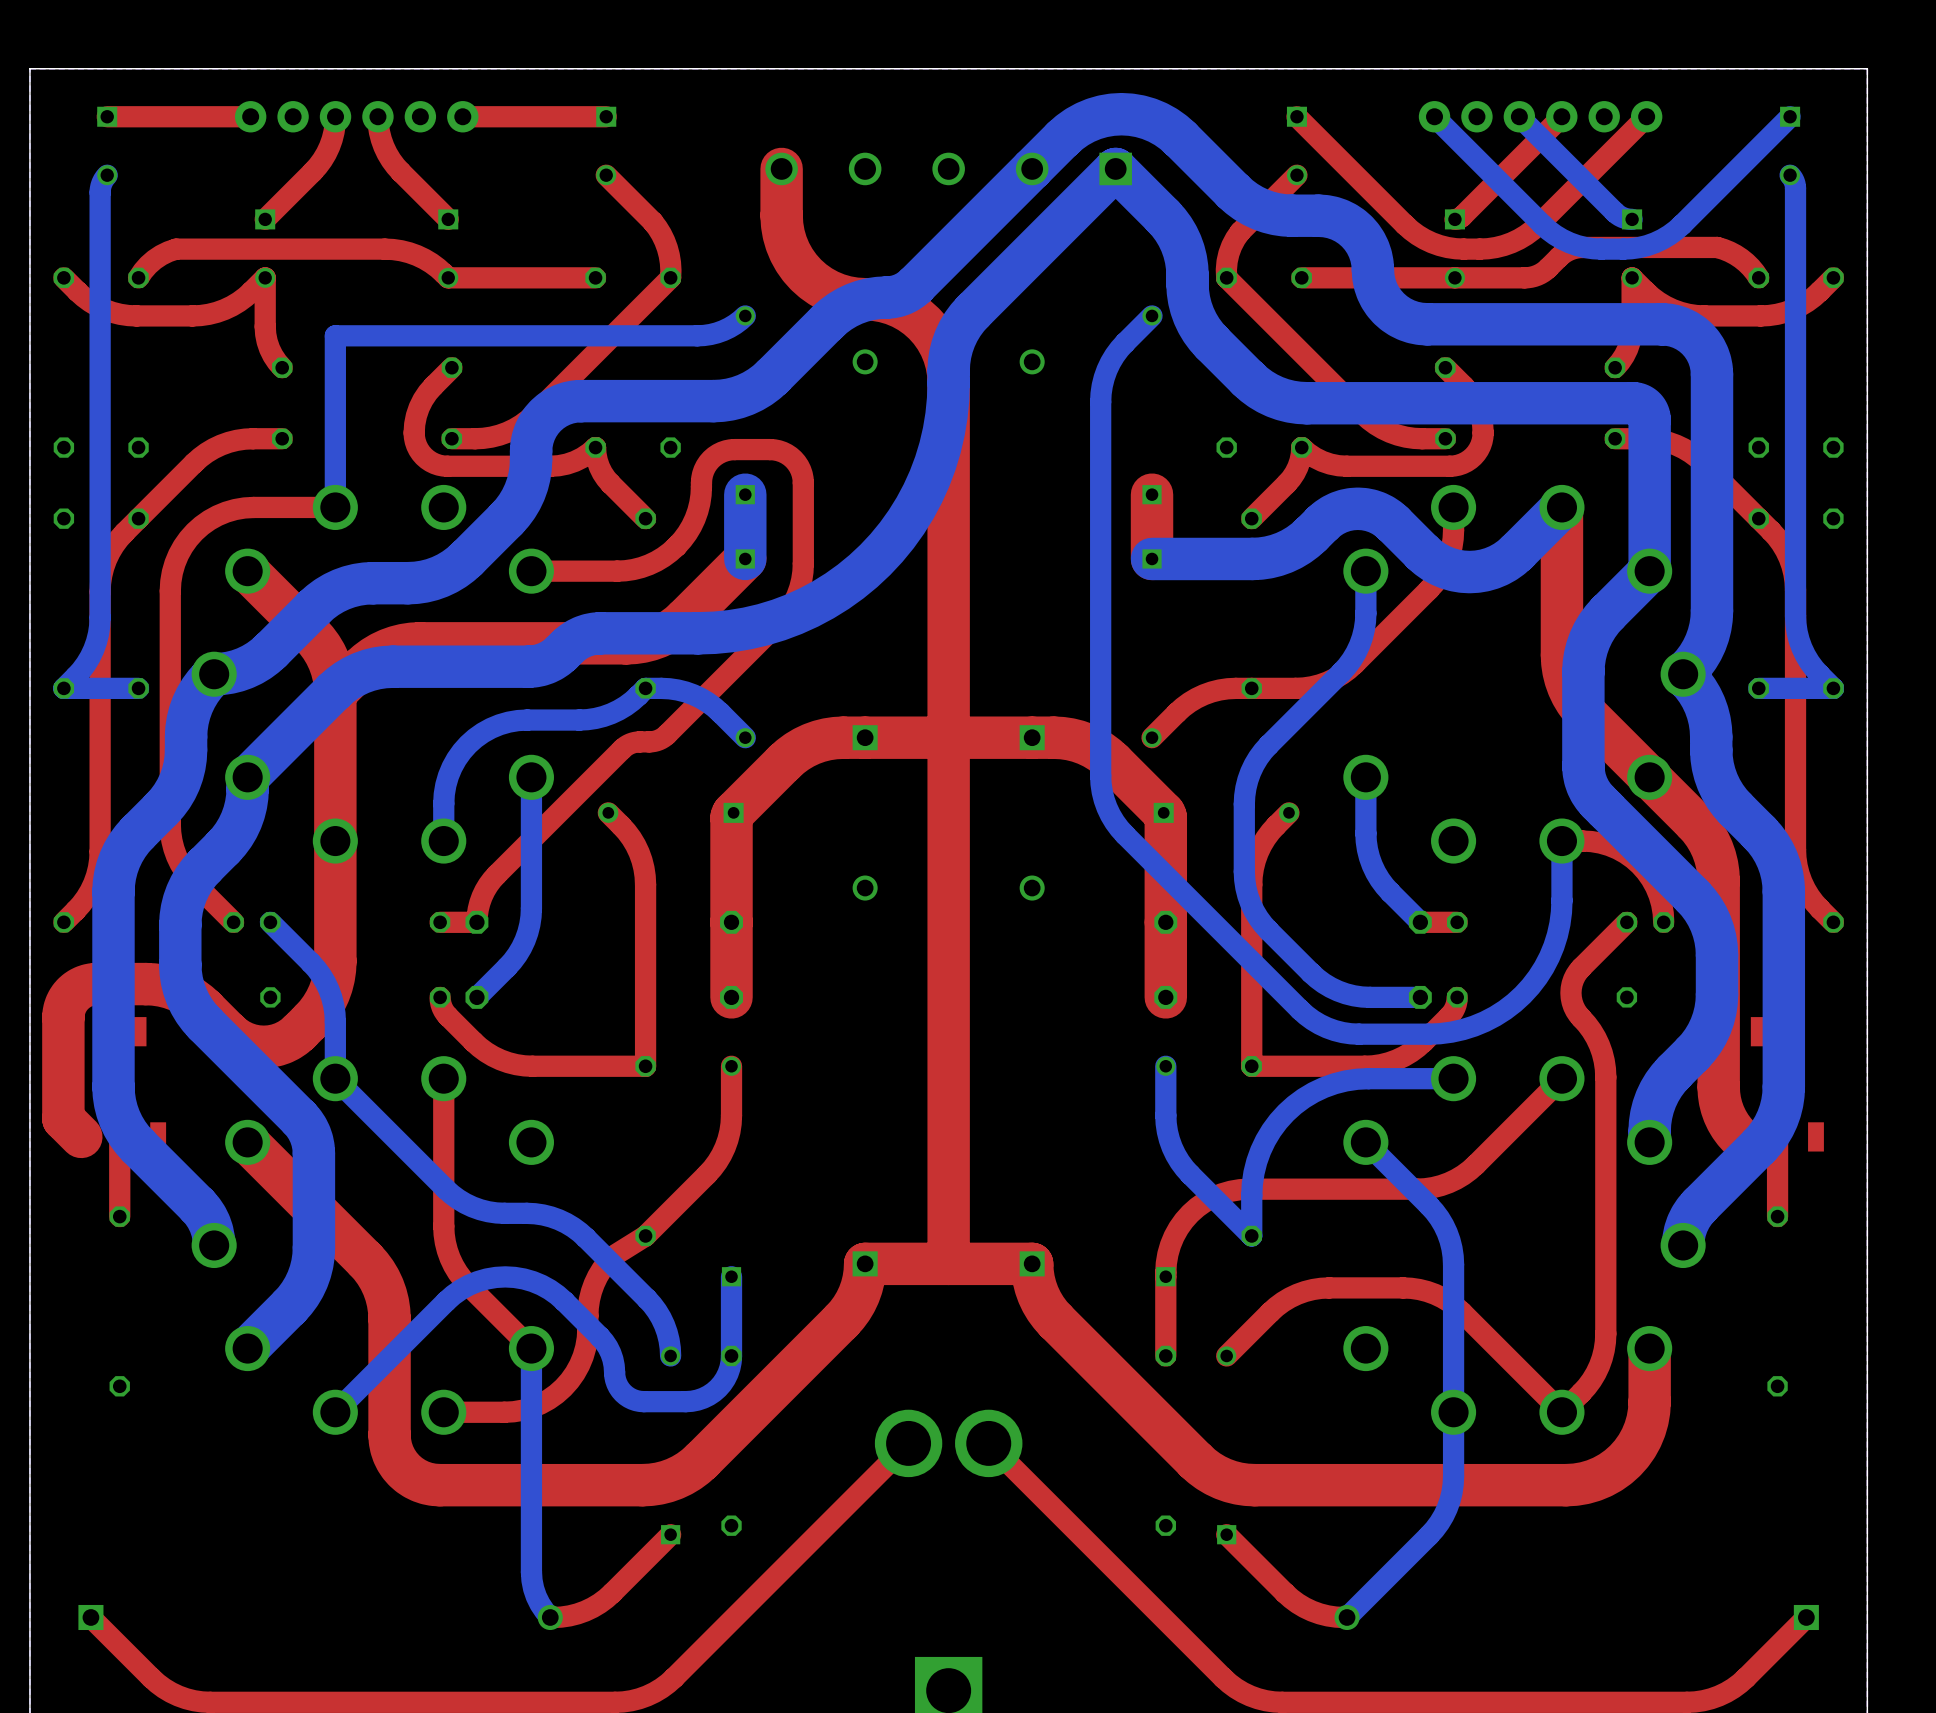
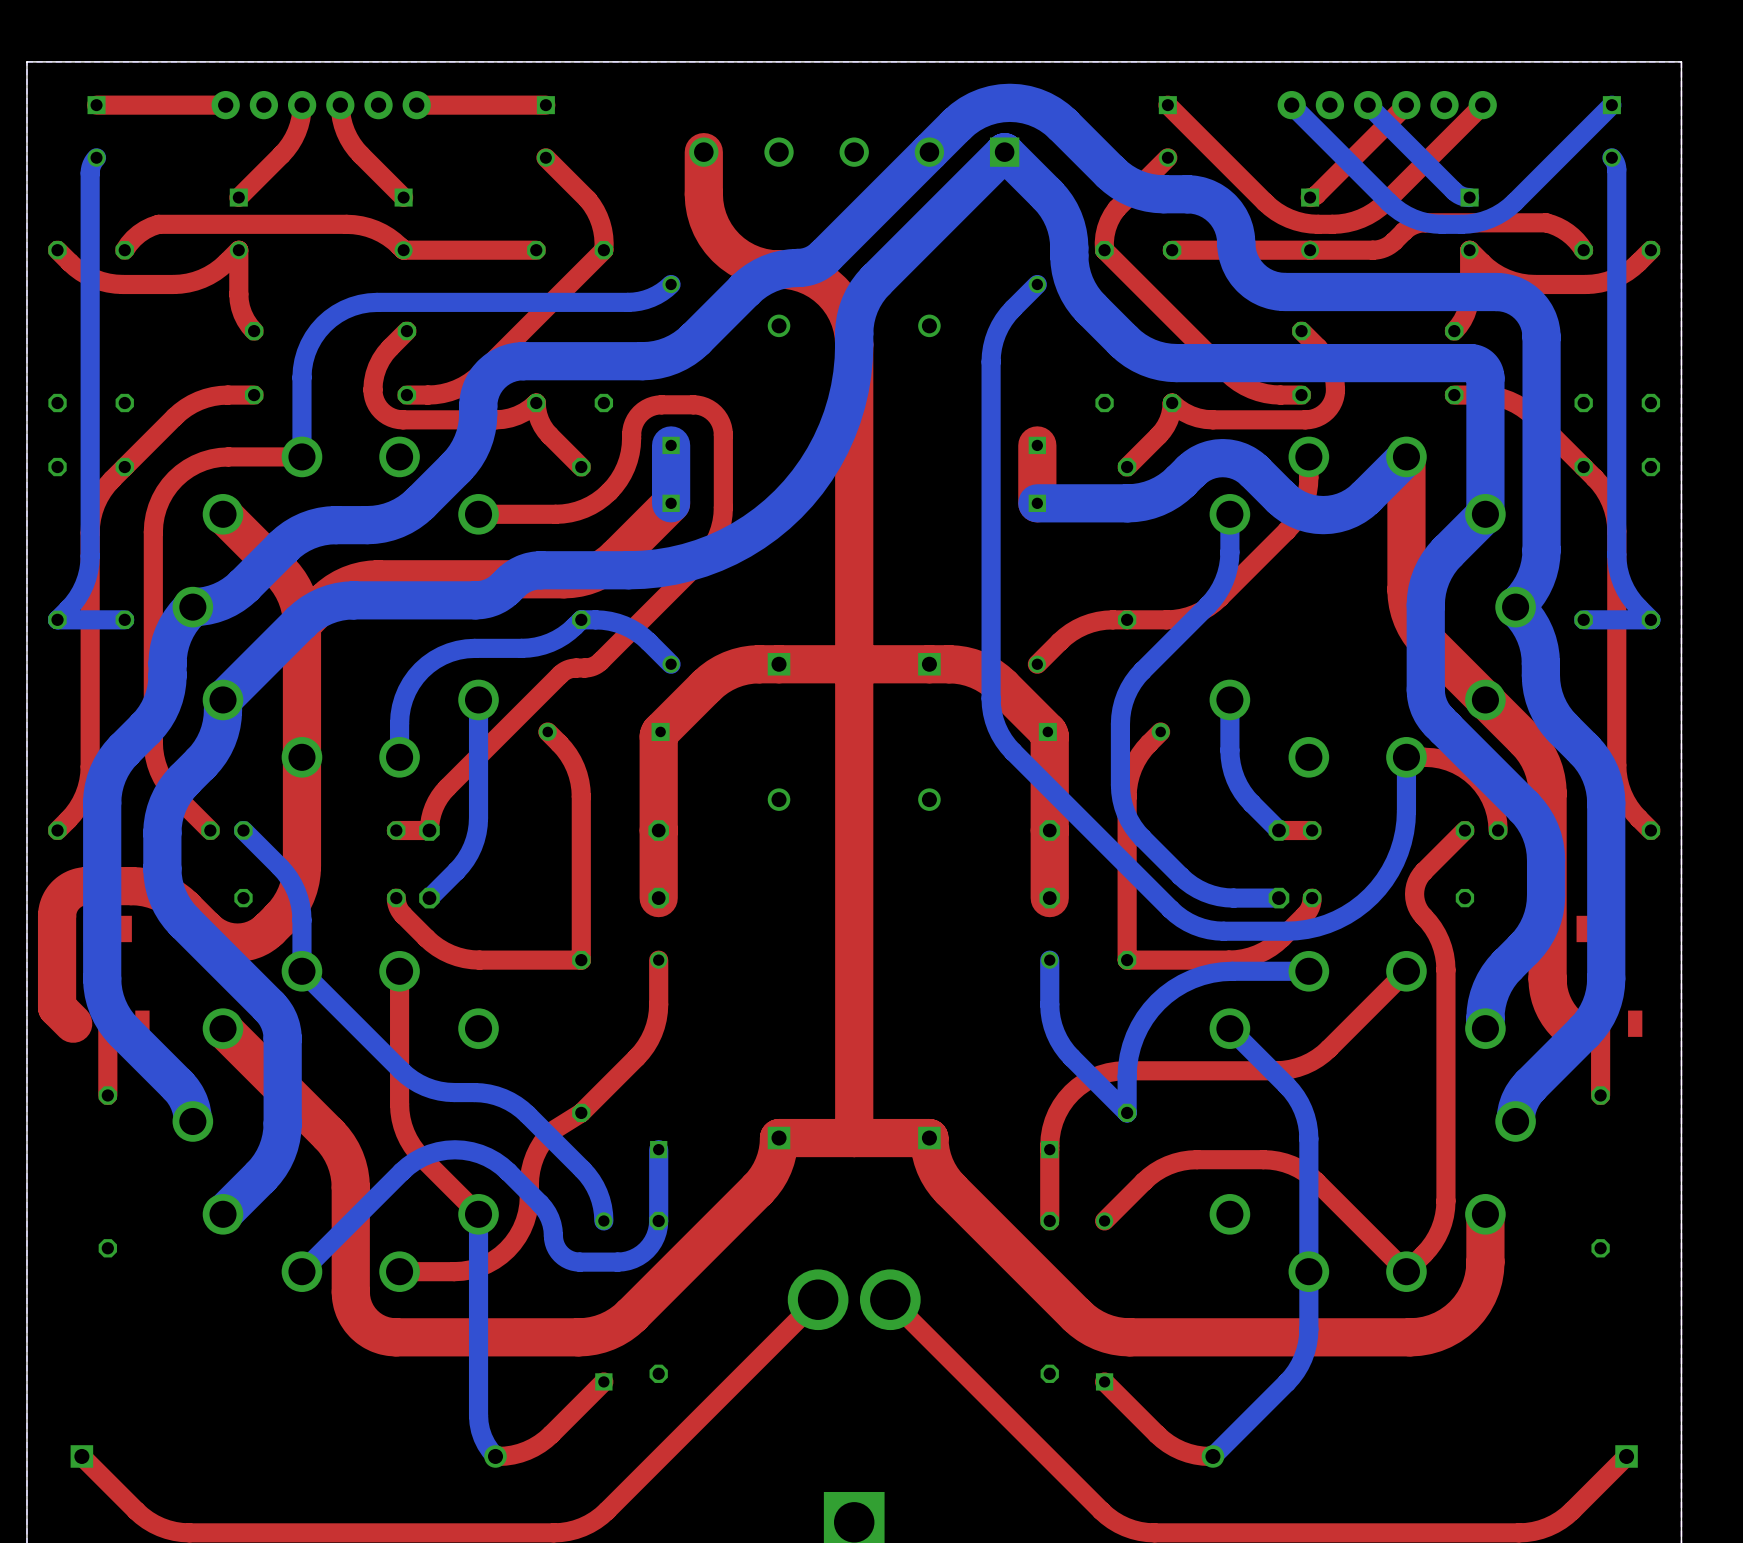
bottom track: (418, 335) (335, 335) (335, 419) -> (377, 302) (352, 306) (337, 313) (324, 324) (313, 337) (306, 352) (301, 377)

